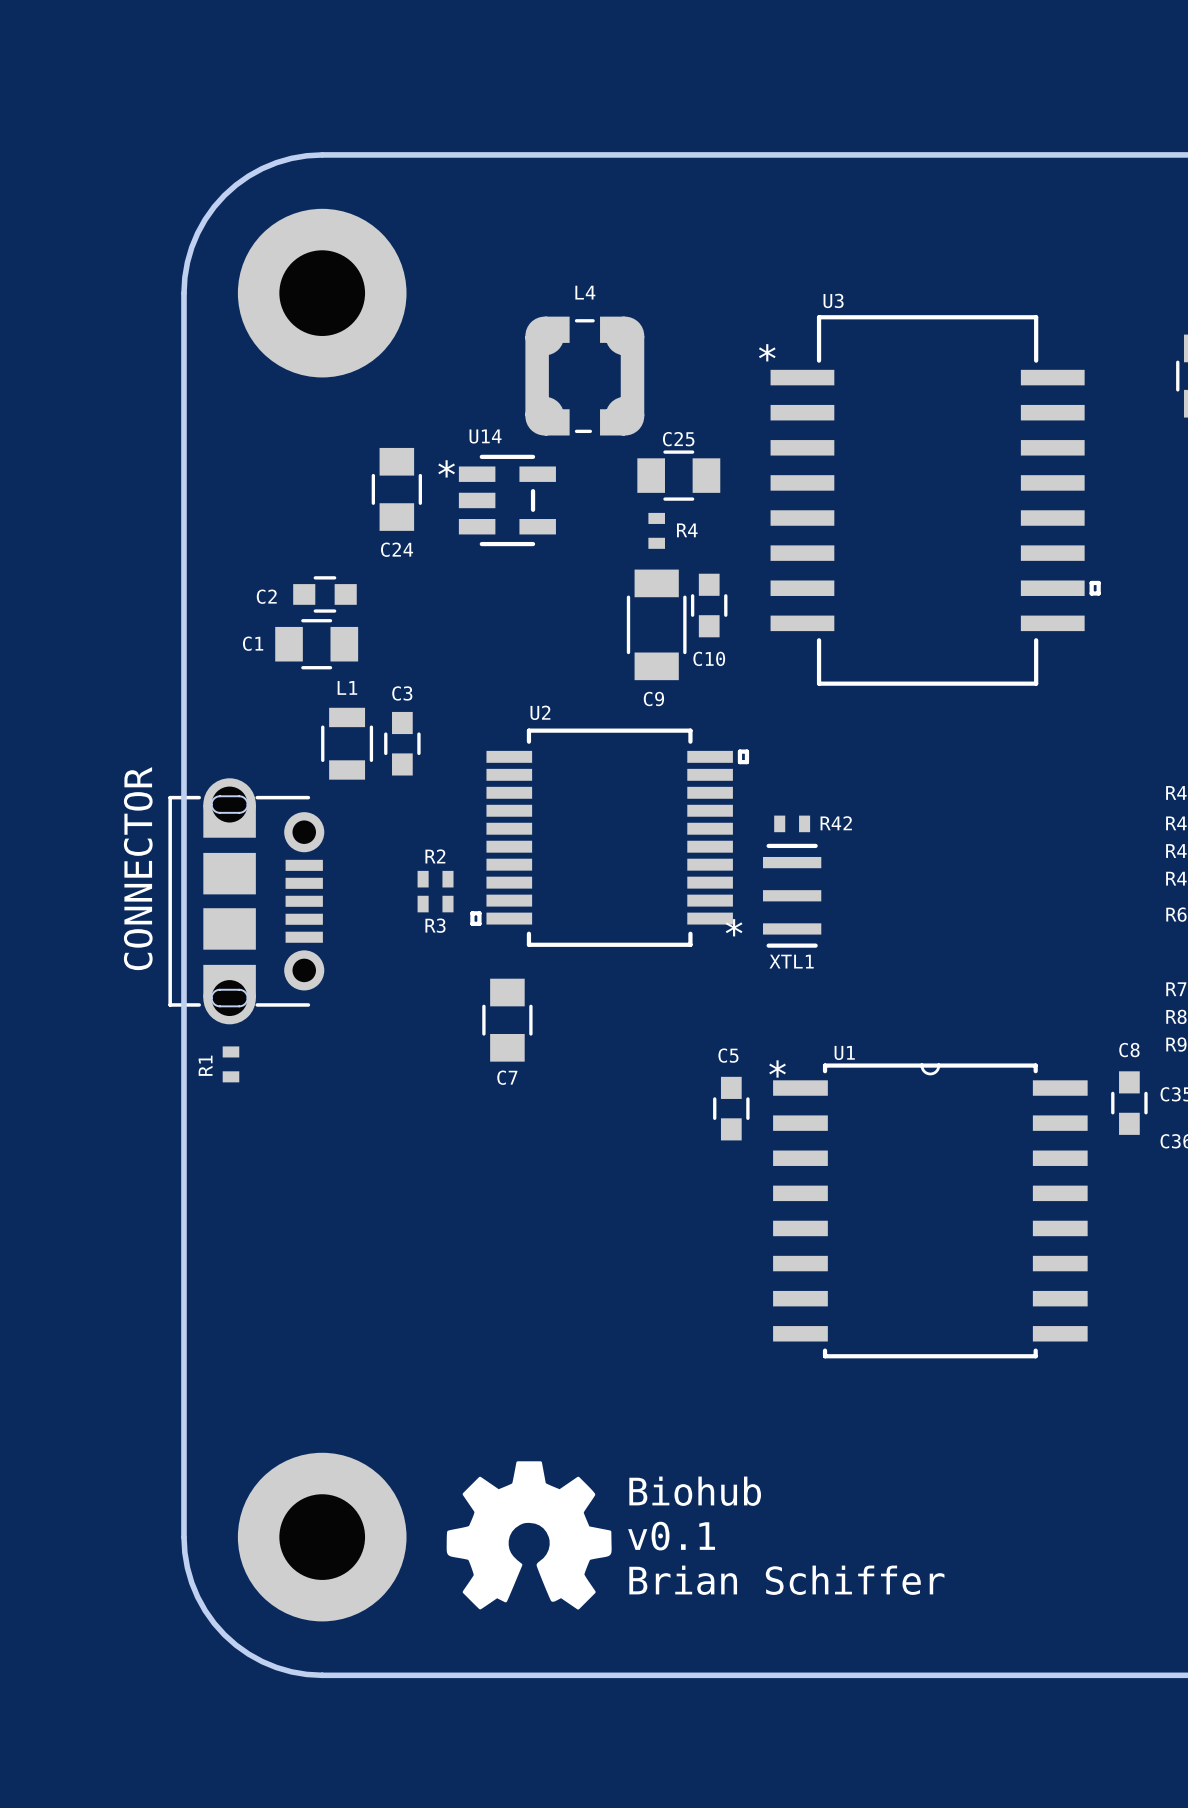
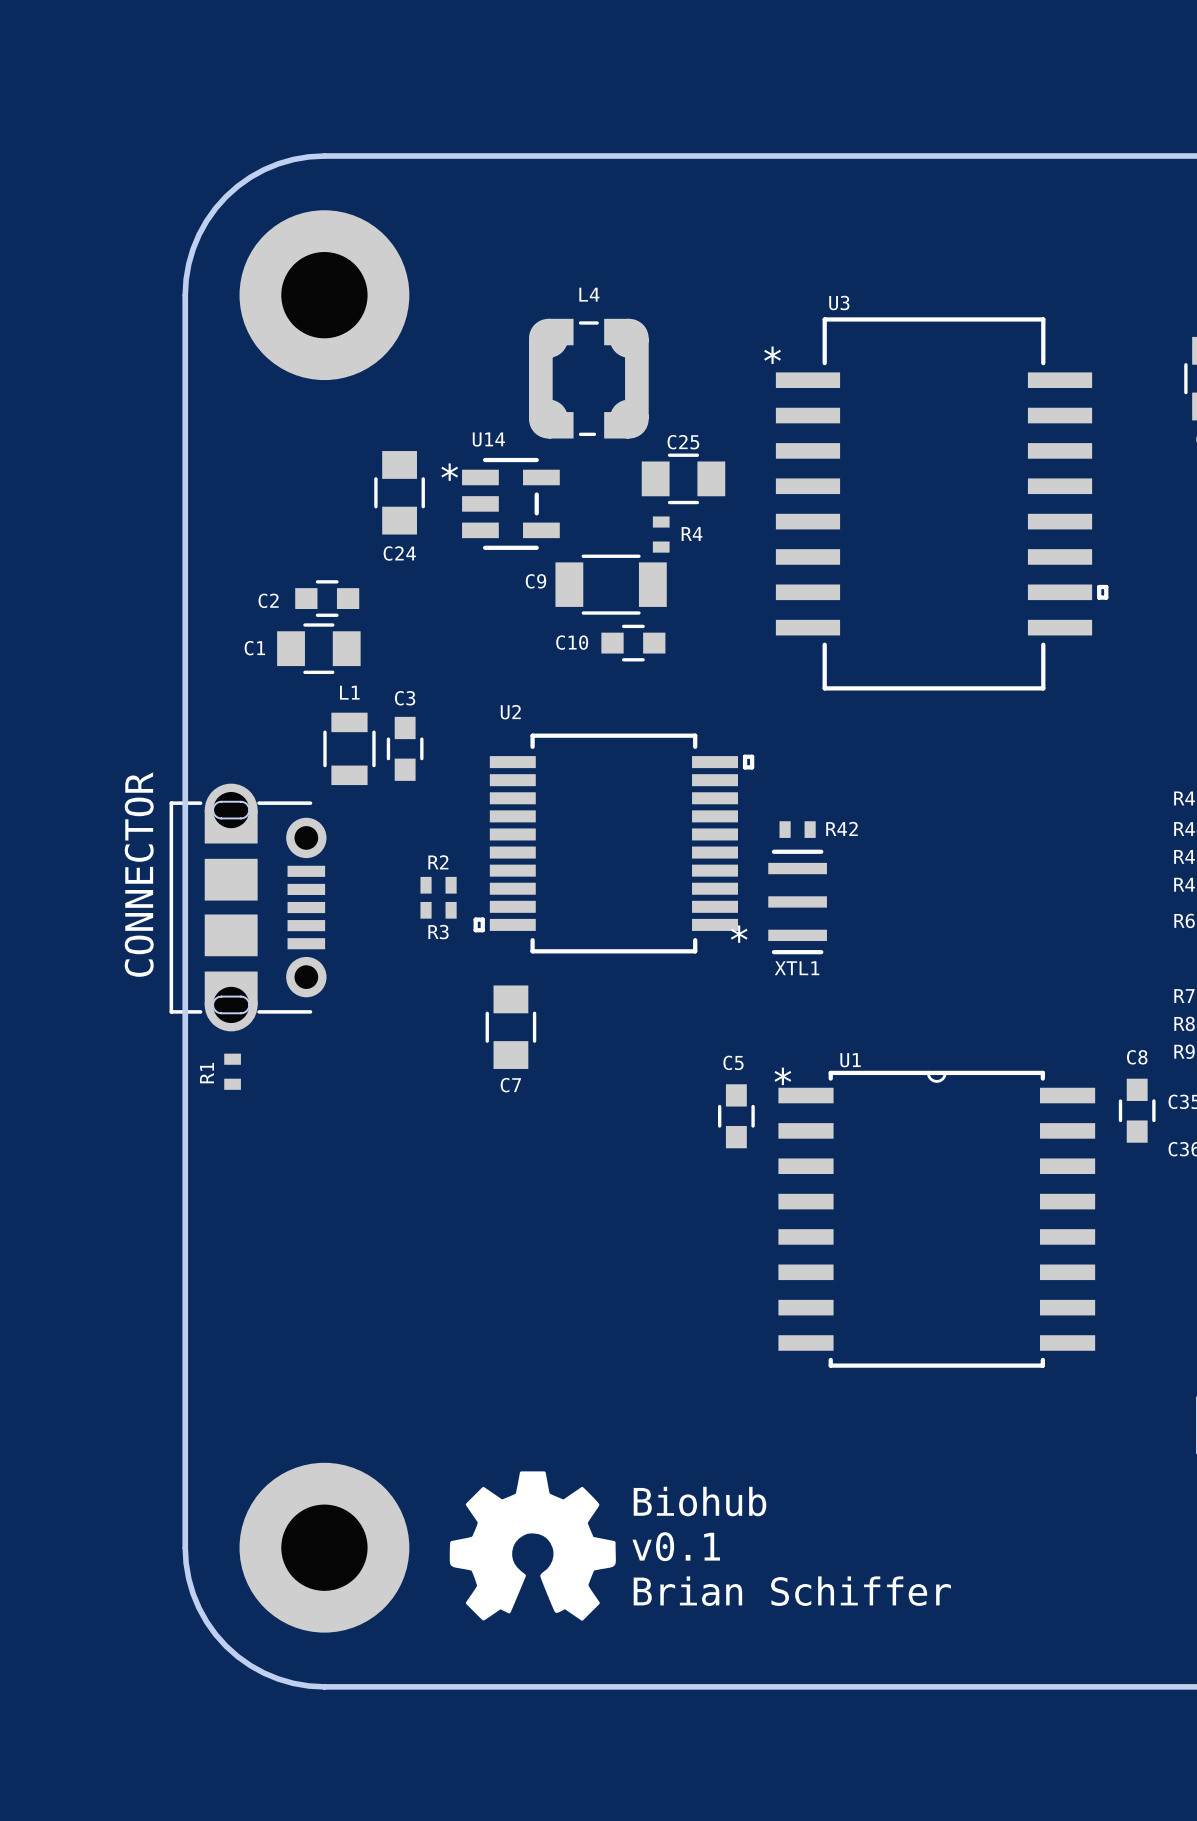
C10 rotation: 0° (709, 605) -> 90° clockwise (633, 643)
C10 position: (709, 605) -> (633, 643)
C9 rotation: 0° (656, 624) -> 90° clockwise (611, 584)
C9 position: (656, 624) -> (611, 584)
U2 name position: U2 (540, 712) -> U2 (510, 712)

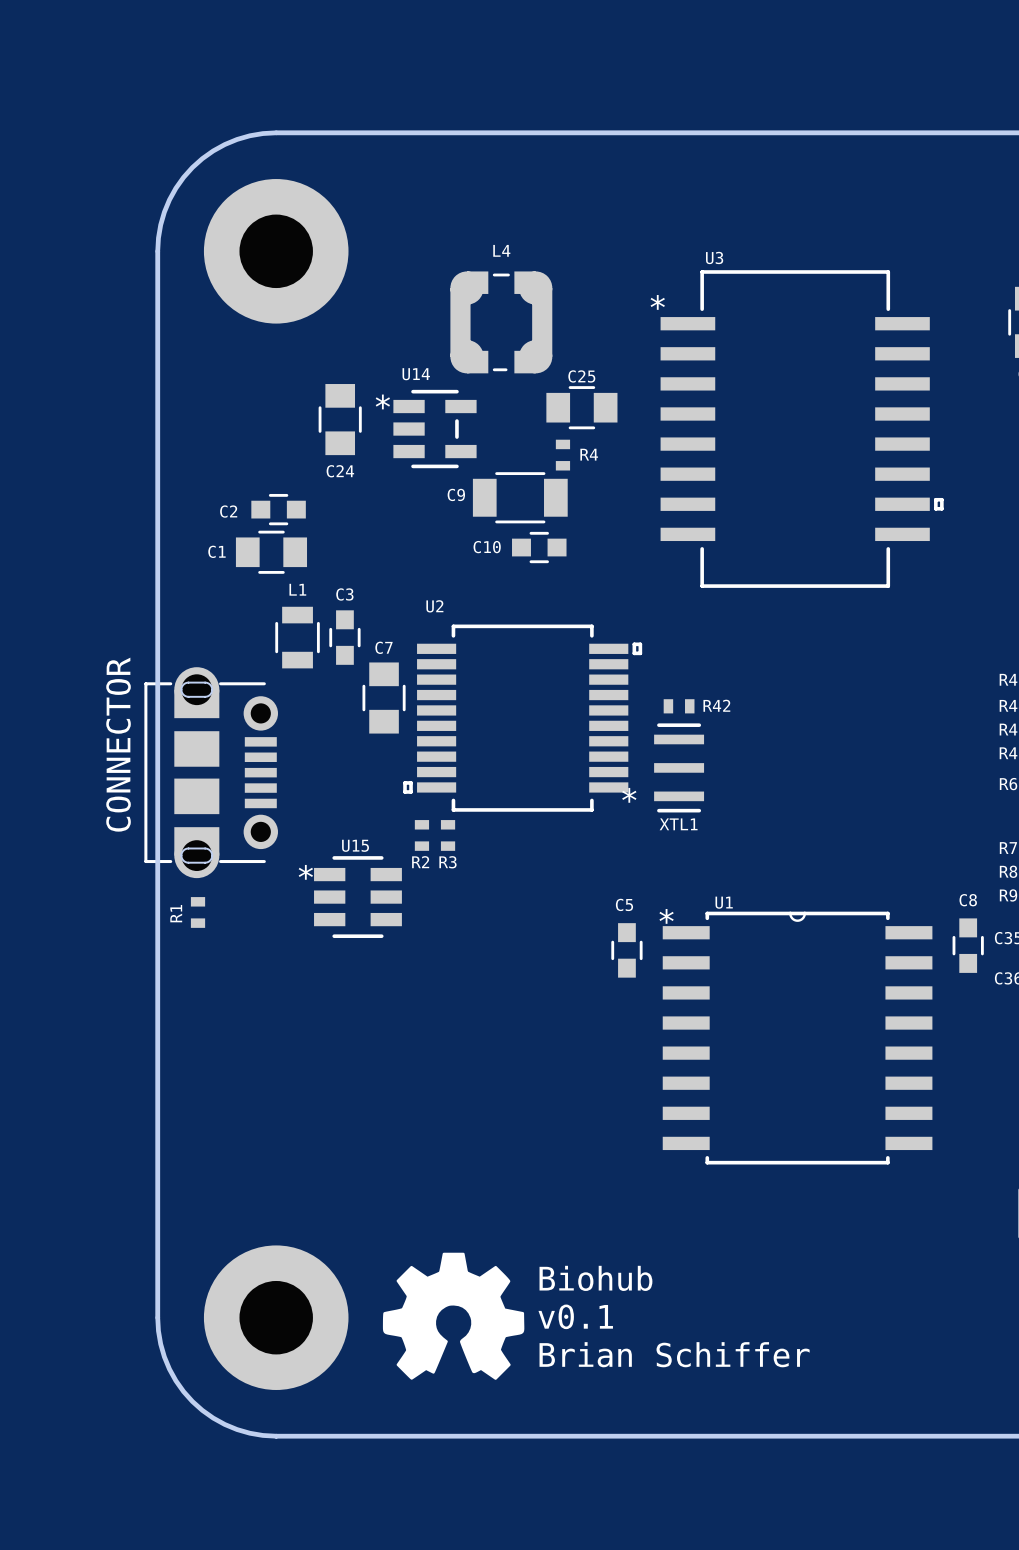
R2 rotation: 0° (438, 885) -> 90° clockwise (421, 835)
R2 position: (438, 885) -> (421, 835)
R3 rotation: 0° (438, 910) -> 90° clockwise (448, 835)
R3 position: (438, 910) -> (448, 835)
C7 position: (510, 1027) -> (384, 698)
U15: none -> (357, 897)
C7 name position: C7 (510, 1085) -> C7 (383, 647)

